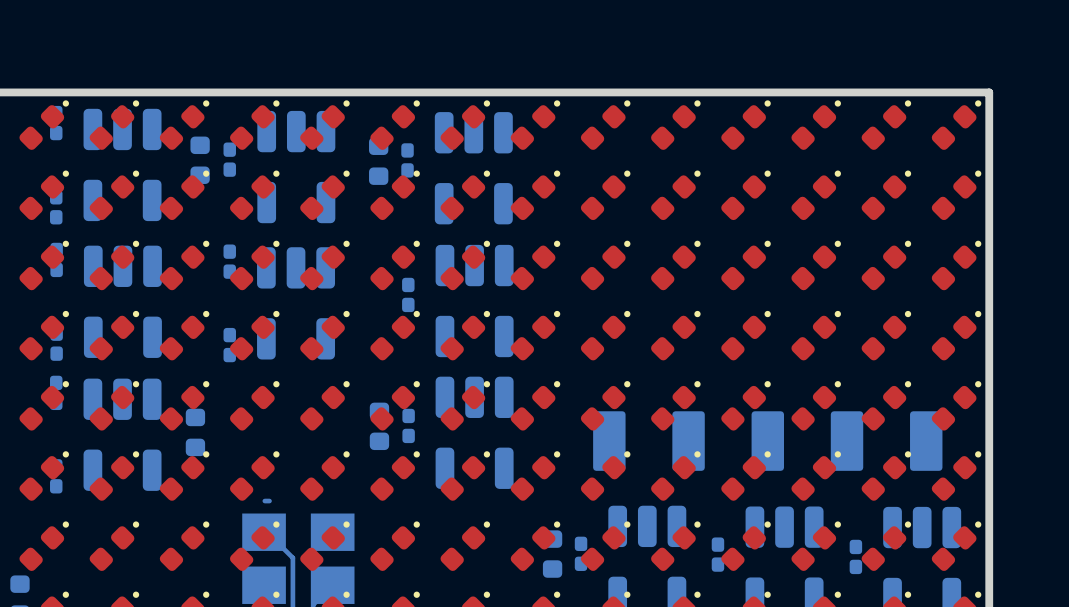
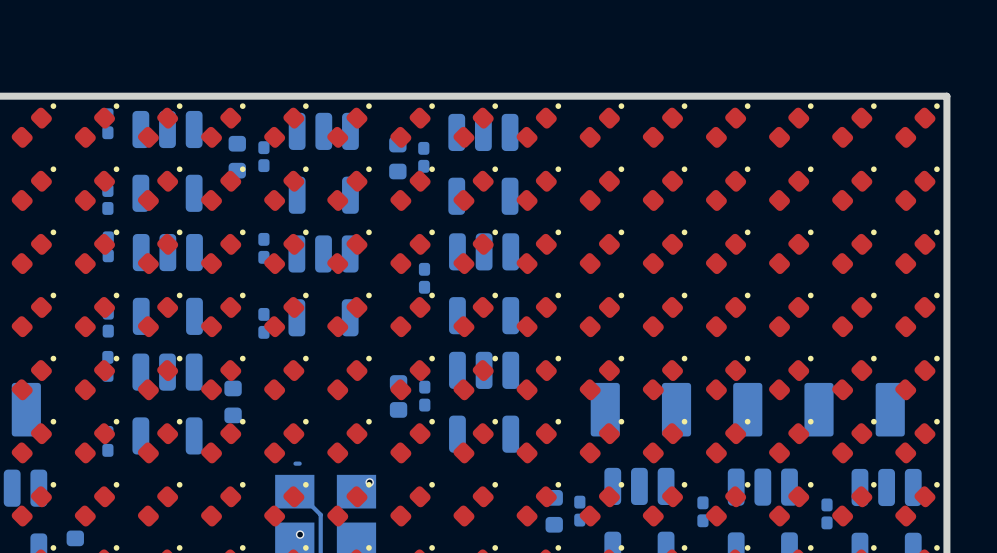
via: none -> (369, 482)
via: none -> (300, 534)

